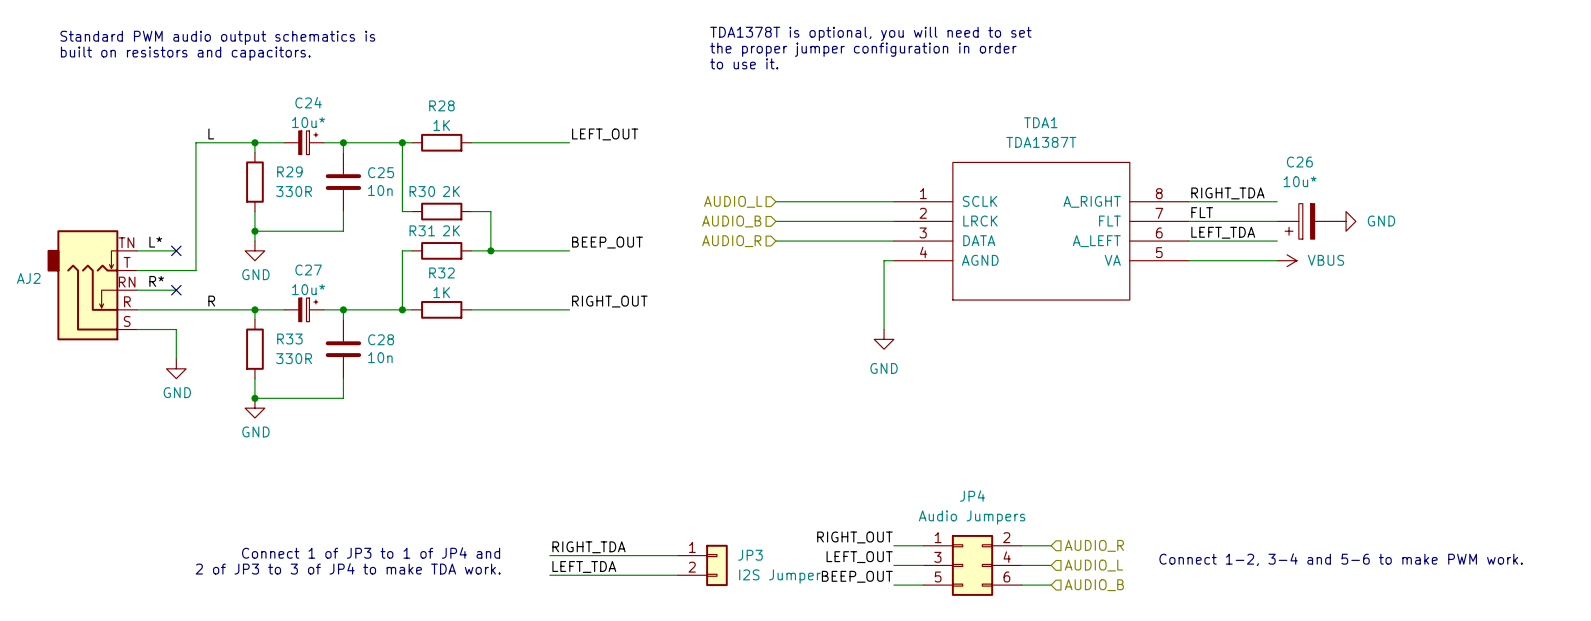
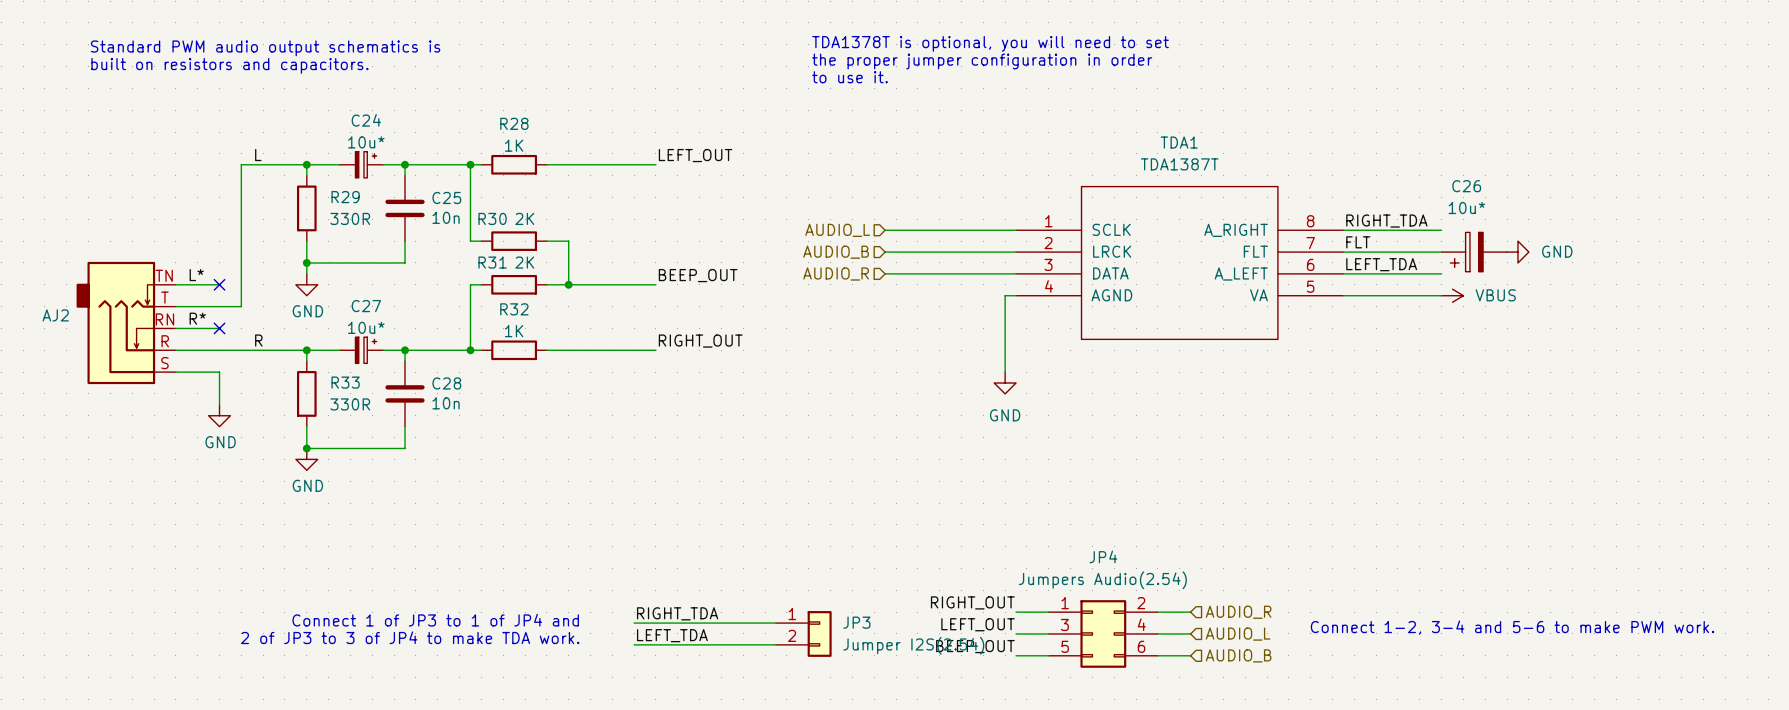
JP4 value: Audio Jumpers (972, 517) -> Jumpers Audio(2.54) (1102, 580)
JP3 value: I2S Jumper (779, 576) -> Jumper I2S(2.54) (913, 645)

